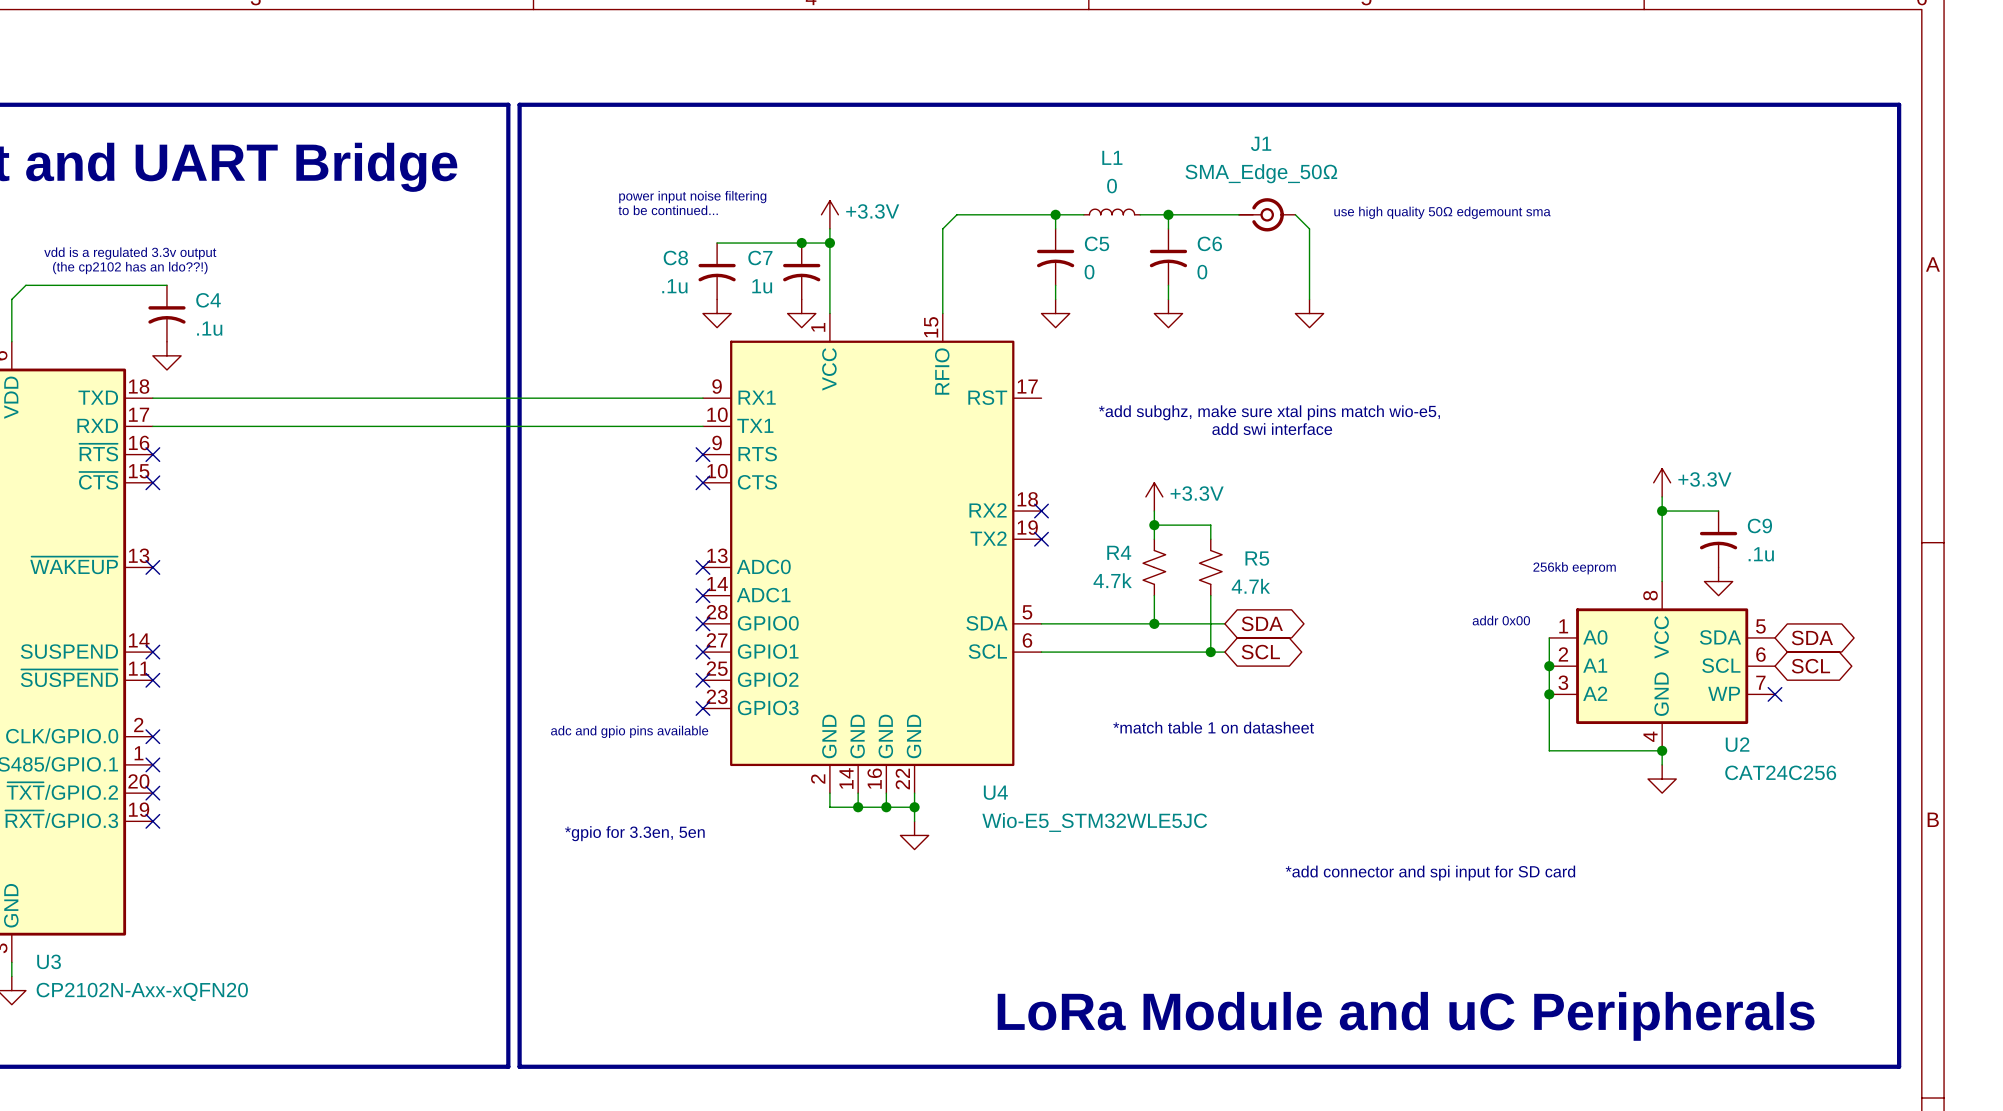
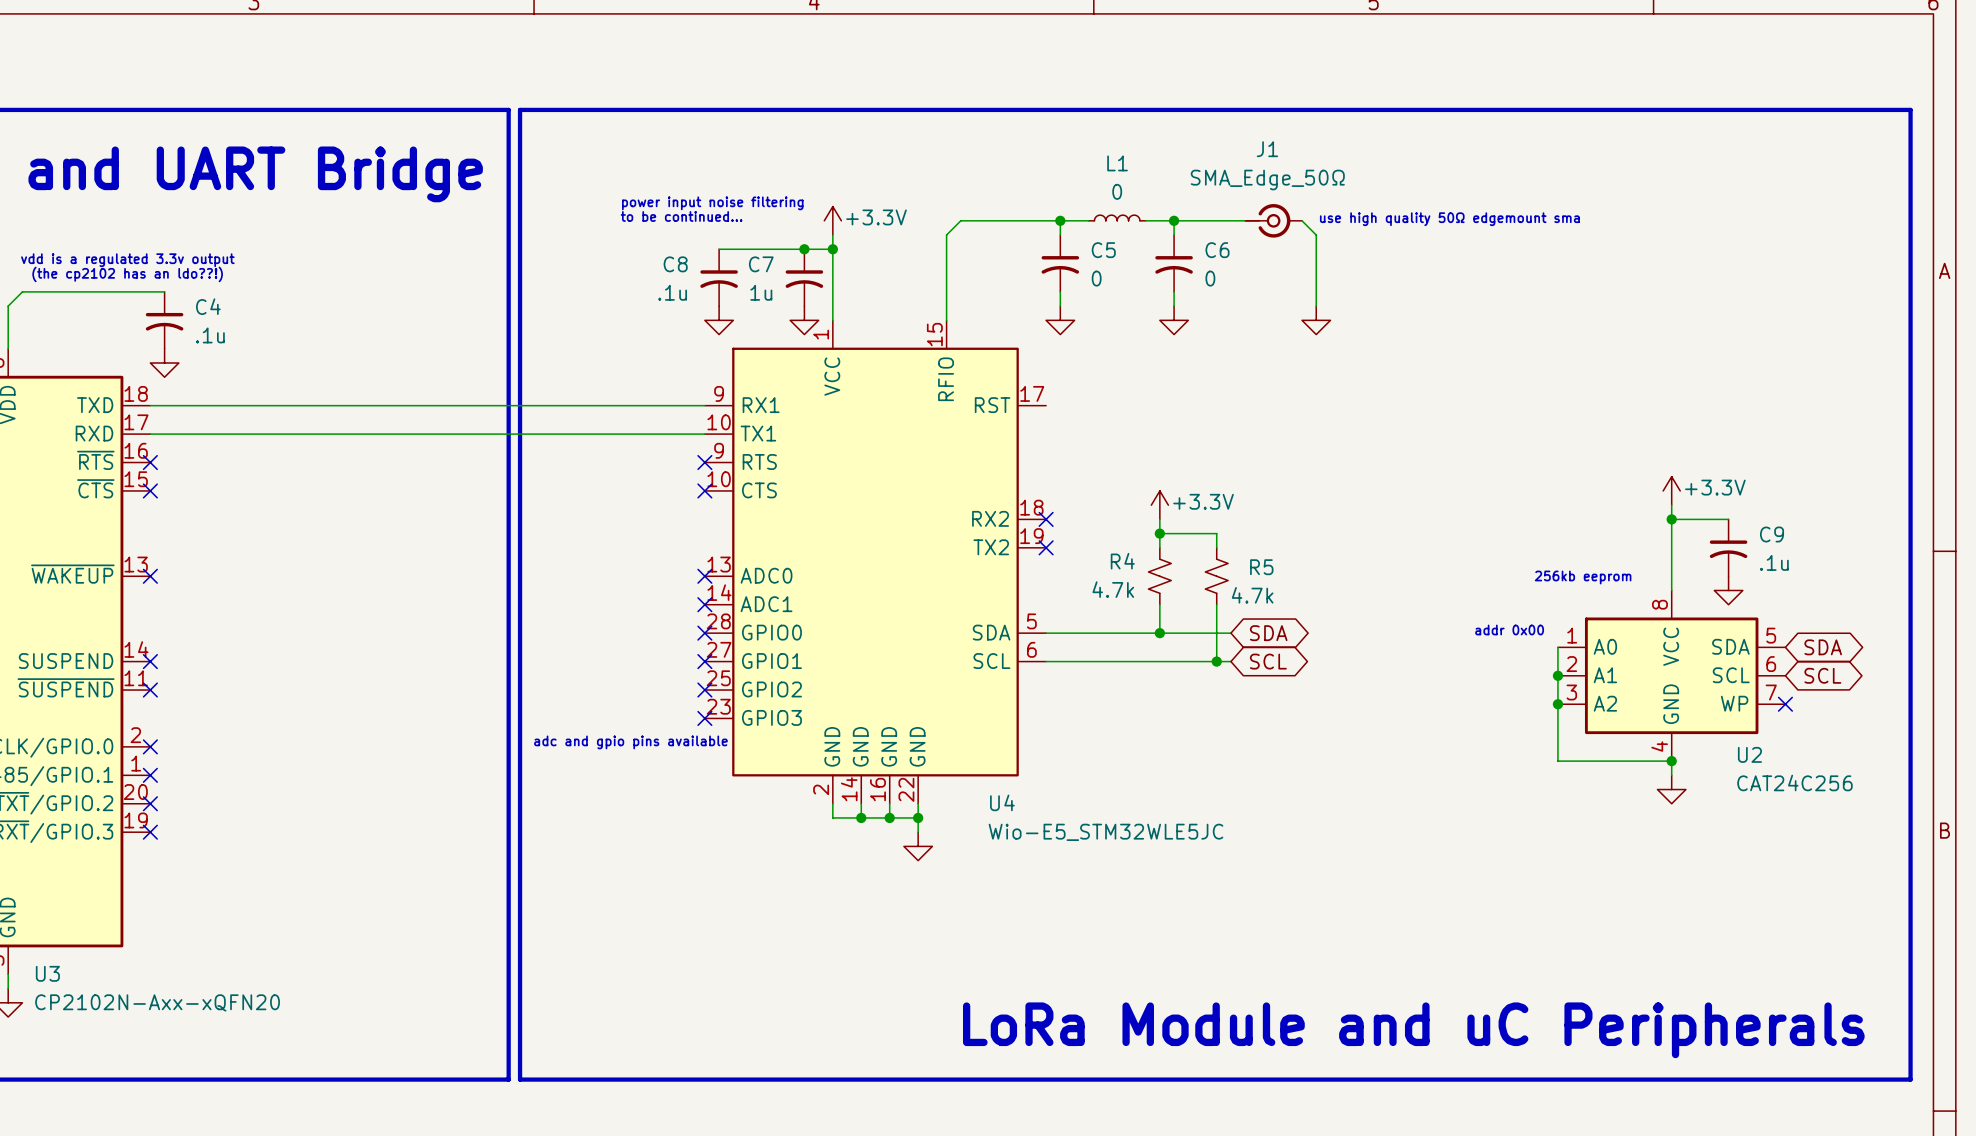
text: *add subghz, make sure xtal pins match wio-e5, (1269, 412) -> none
text: add swi interface (1272, 429) -> none
text: *match table 1 on datasheet (1213, 727) -> none
text: *gpio for 3.3en, 5en (634, 833) -> none
text: *add connector and spi input for SD card (1430, 873) -> none

